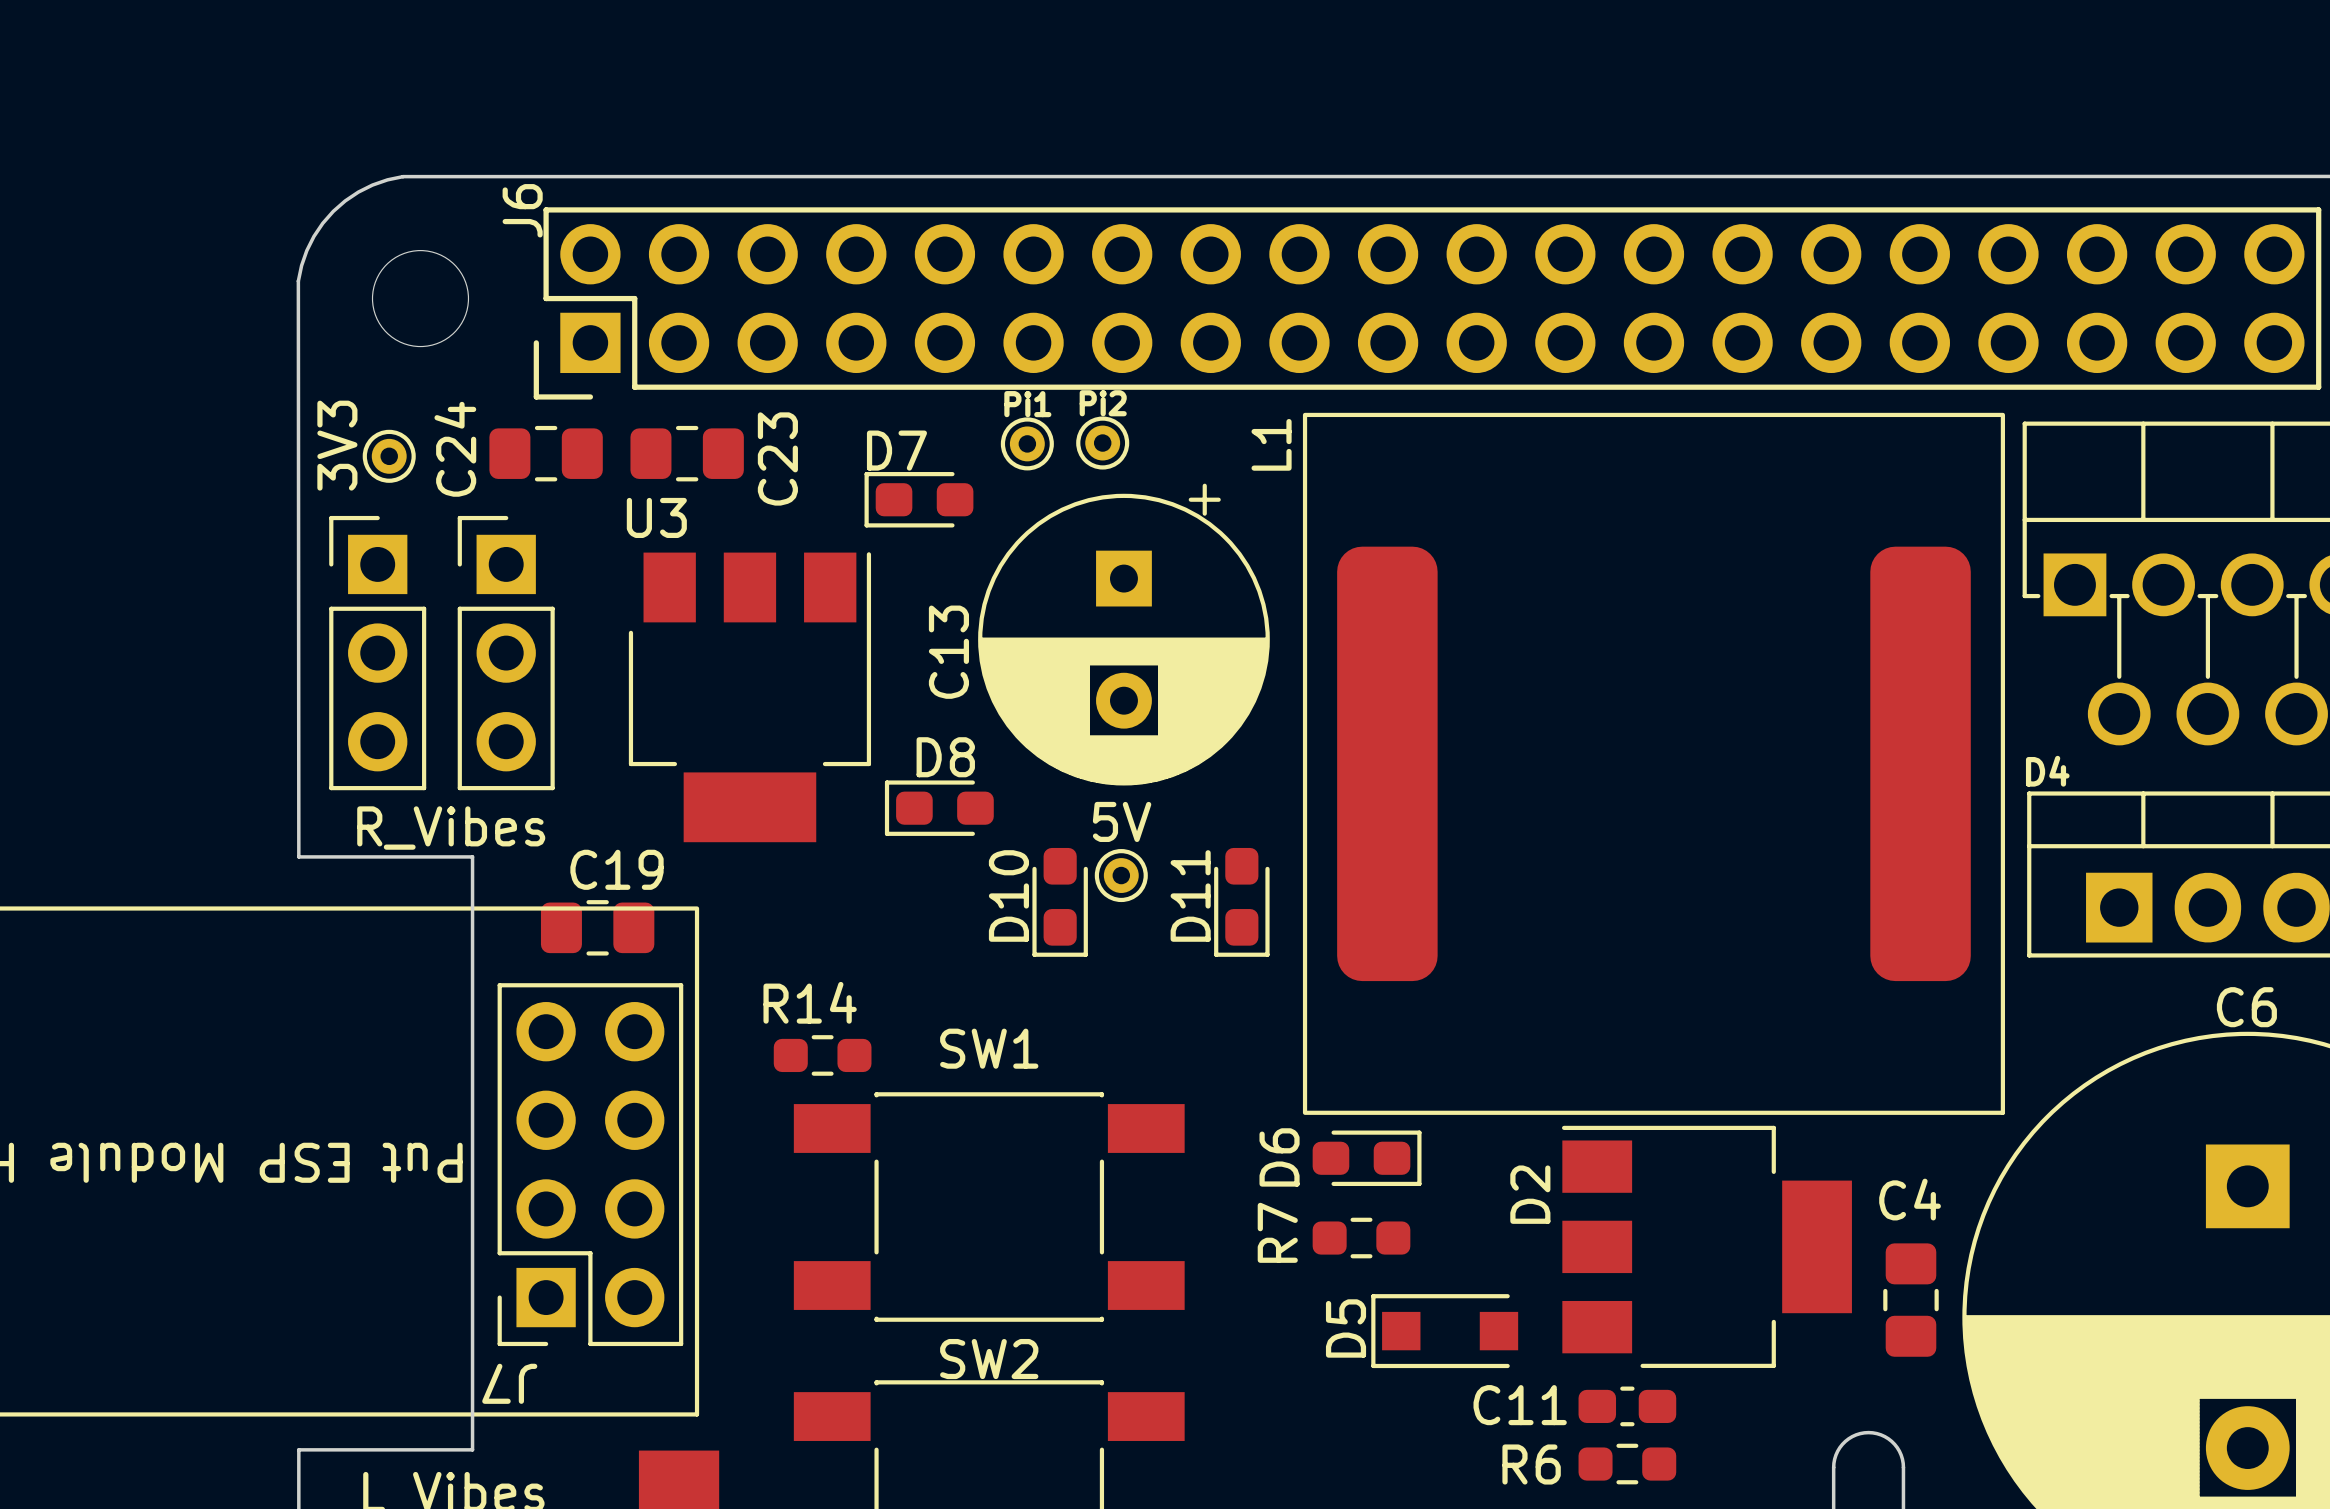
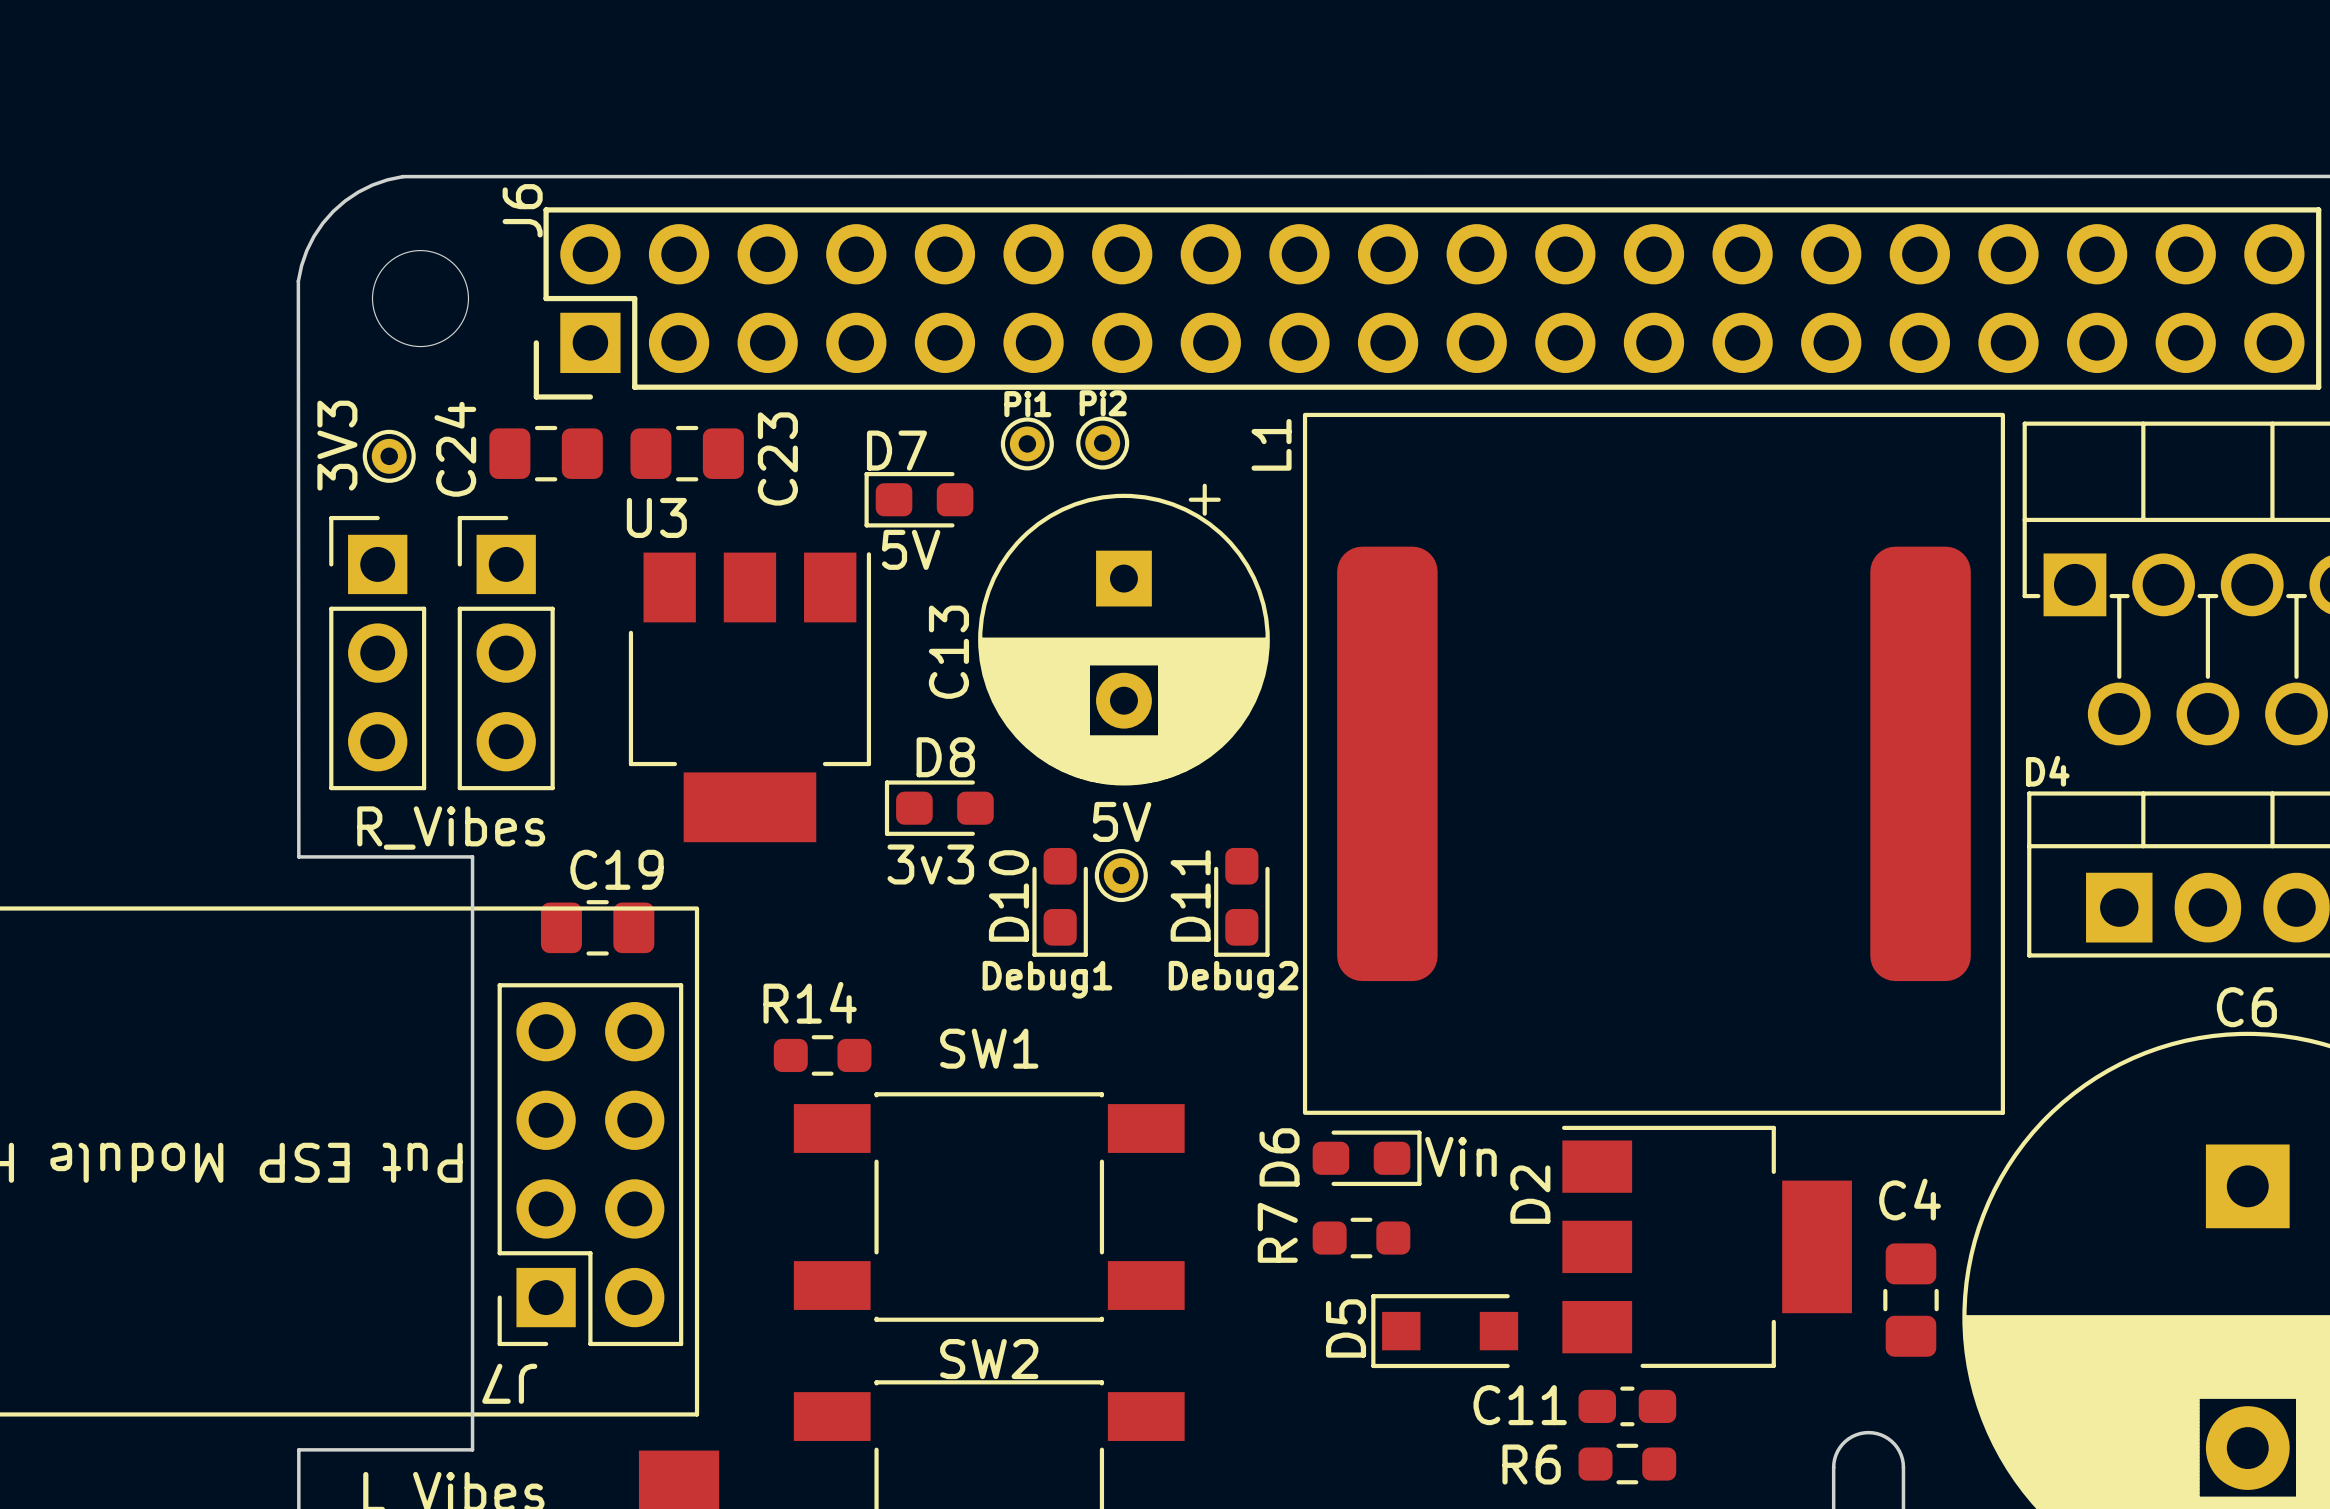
D7 value: none -> 5V (911, 549)
D8 value: none -> 3v3 (930, 864)
D10 value: none -> Debug1 (1047, 979)
D11 value: none -> Debug2 (1233, 979)
D6 value: none -> Vin (1460, 1156)

